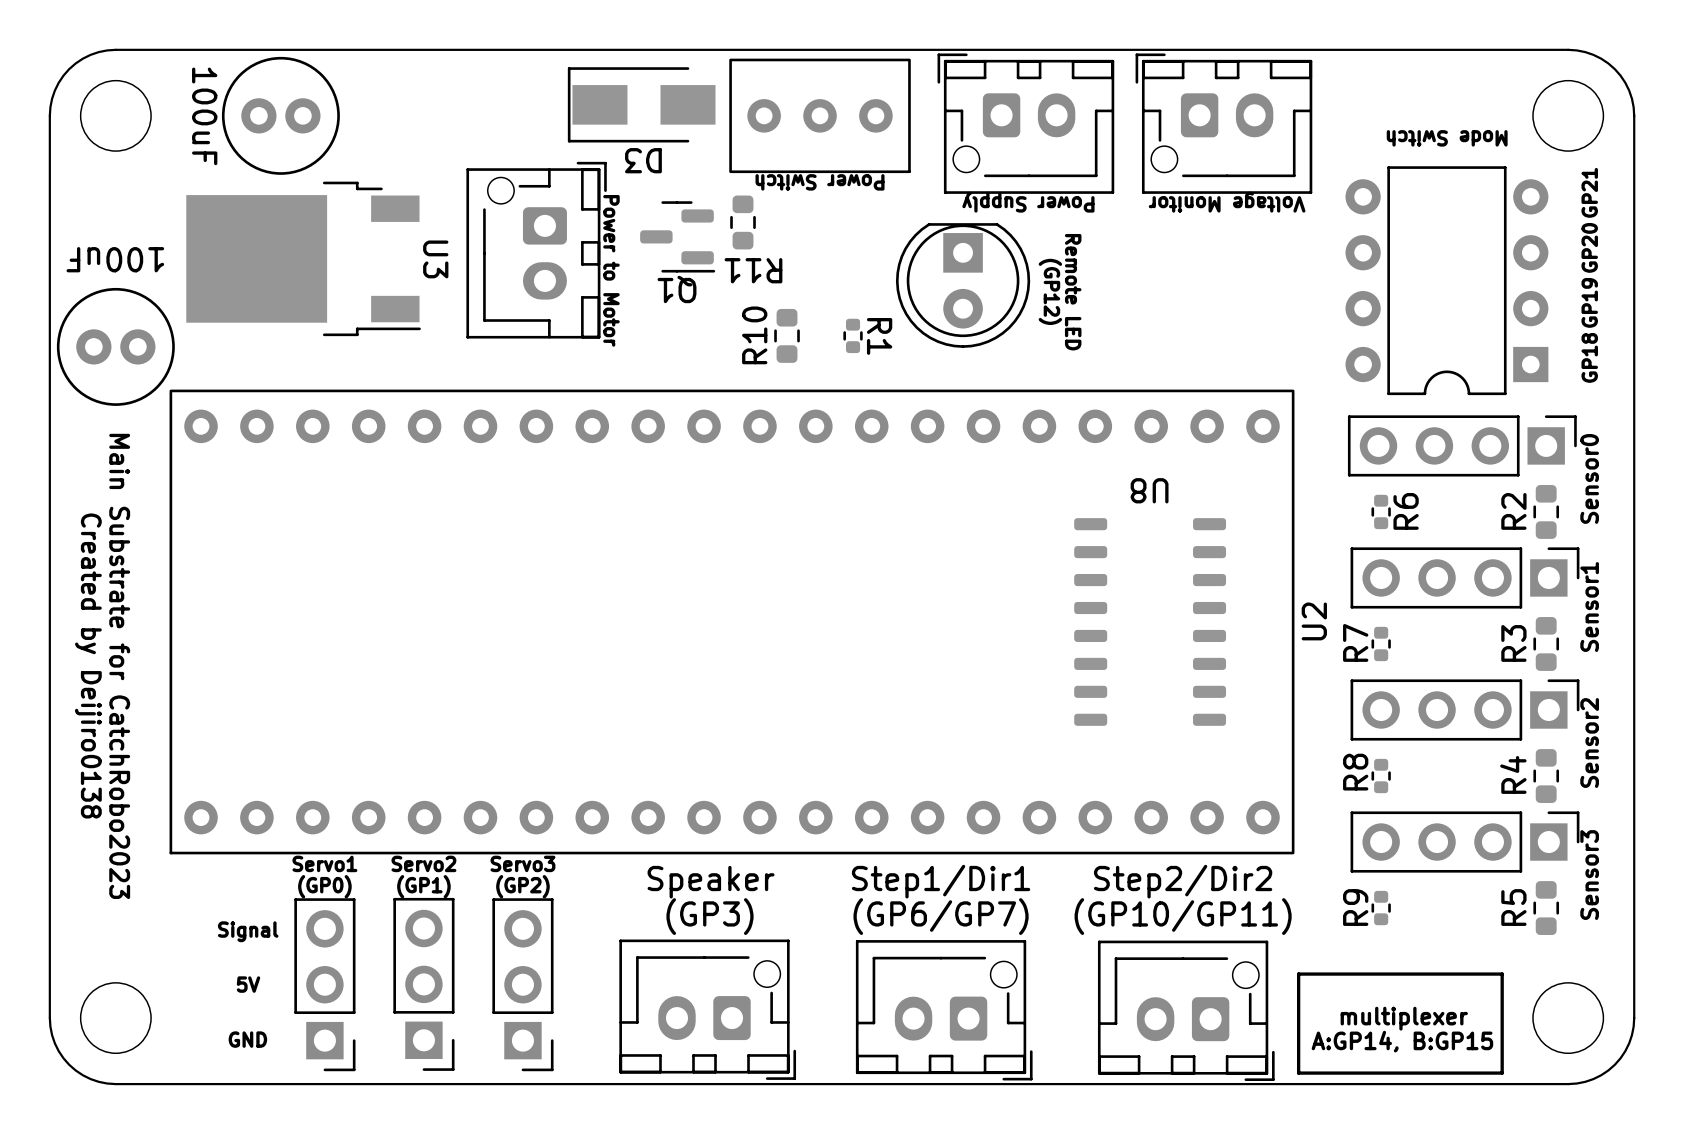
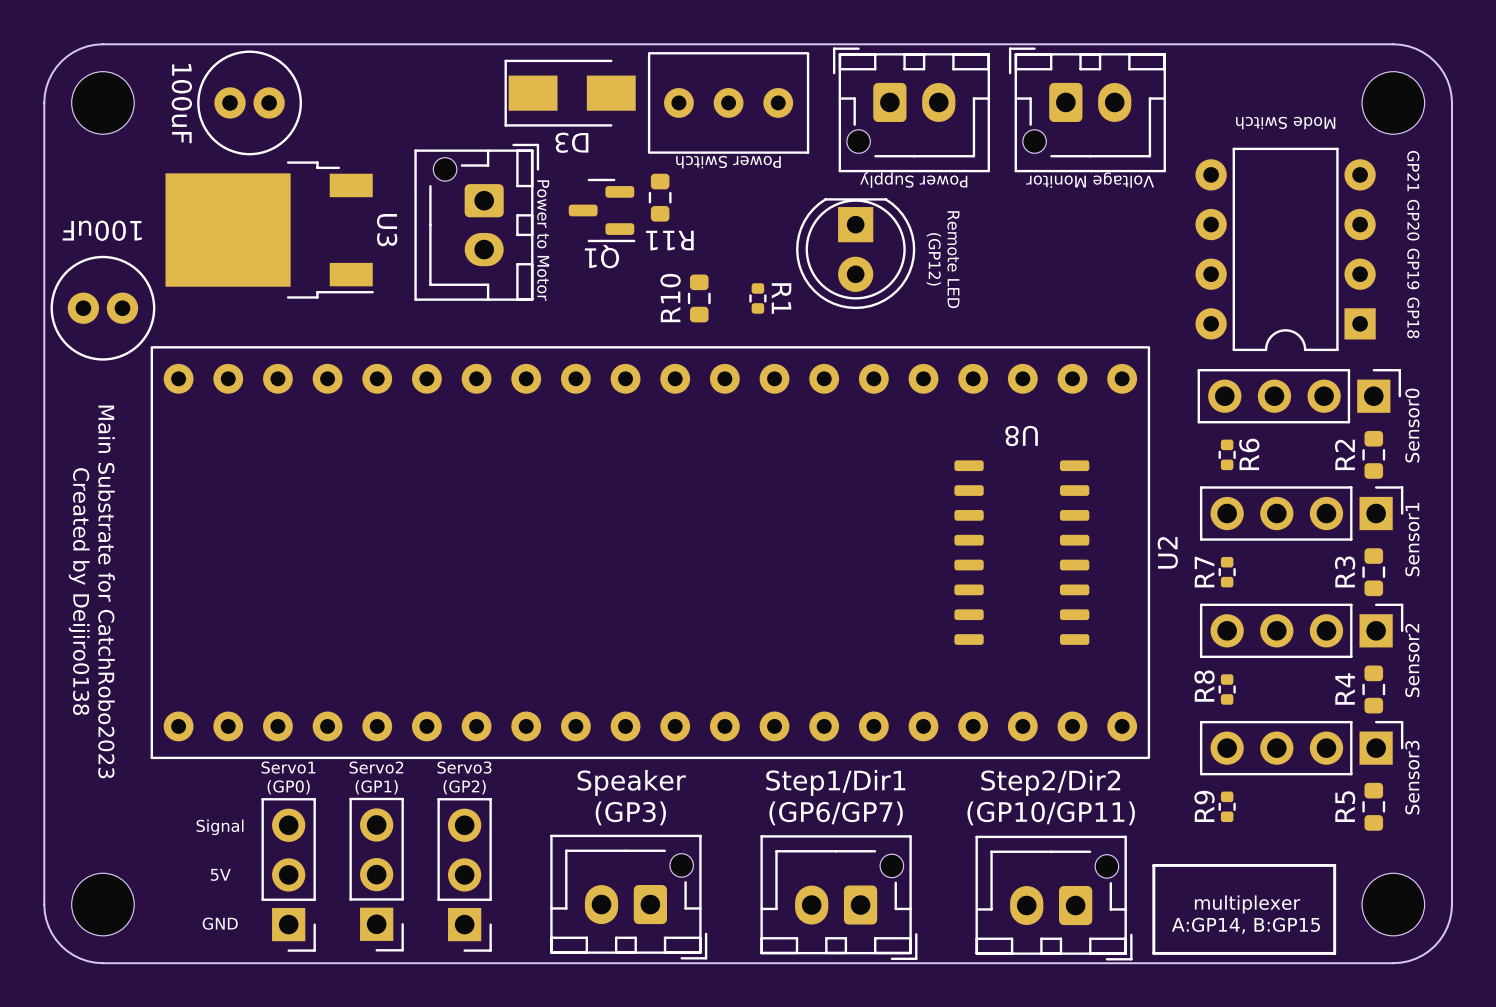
text rotation: 0° (1589, 192) -> 180° (1413, 171)
text rotation: 0° (1589, 247) -> 180° (1413, 220)
text rotation: 0° (1589, 302) -> 180° (1413, 269)
text rotation: 0° (1589, 357) -> 180° (1413, 317)

